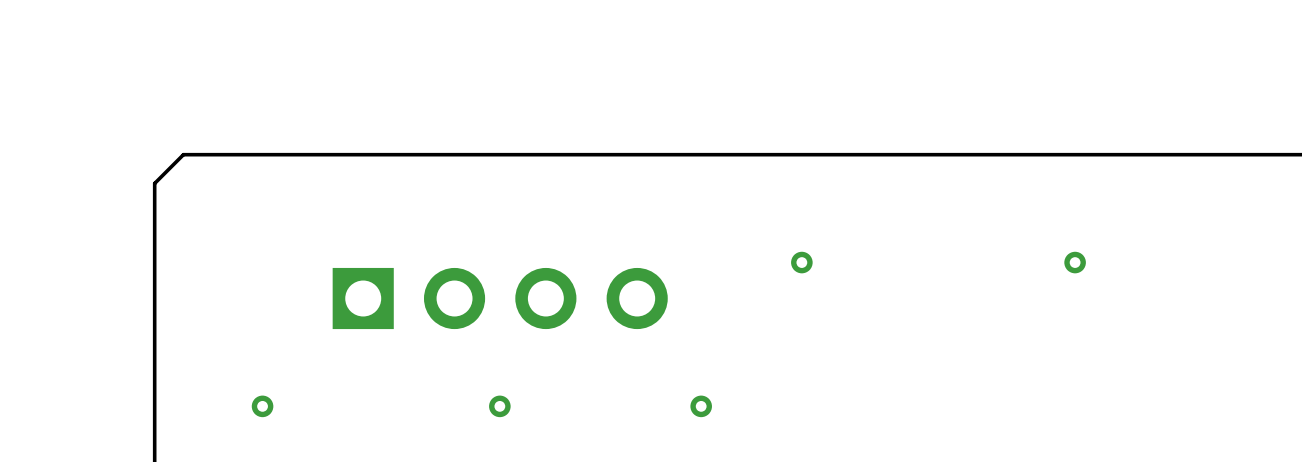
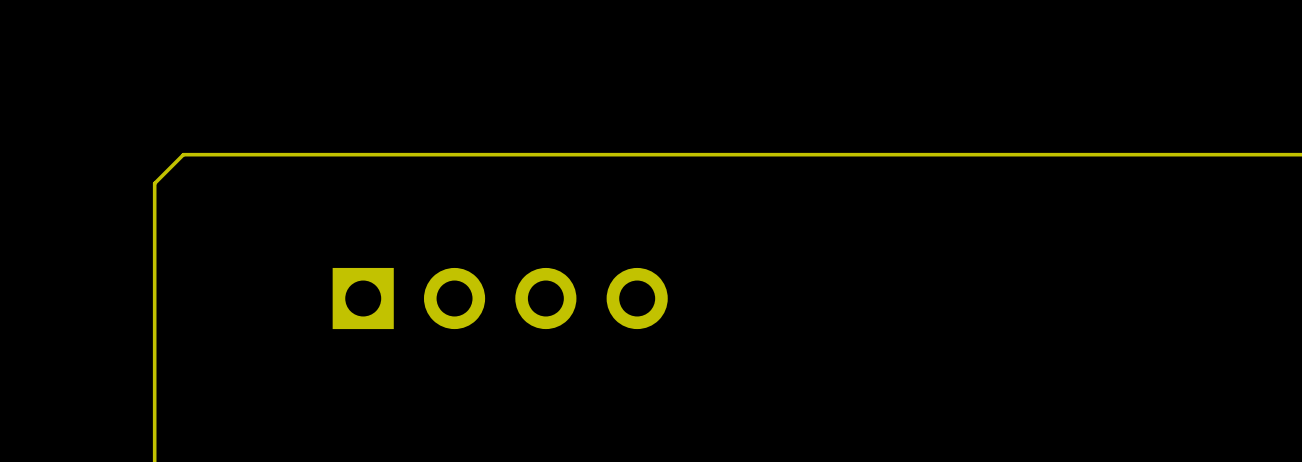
via: (801, 262) -> none
via: (1075, 262) -> none
via: (262, 406) -> none
via: (499, 406) -> none
via: (701, 406) -> none

